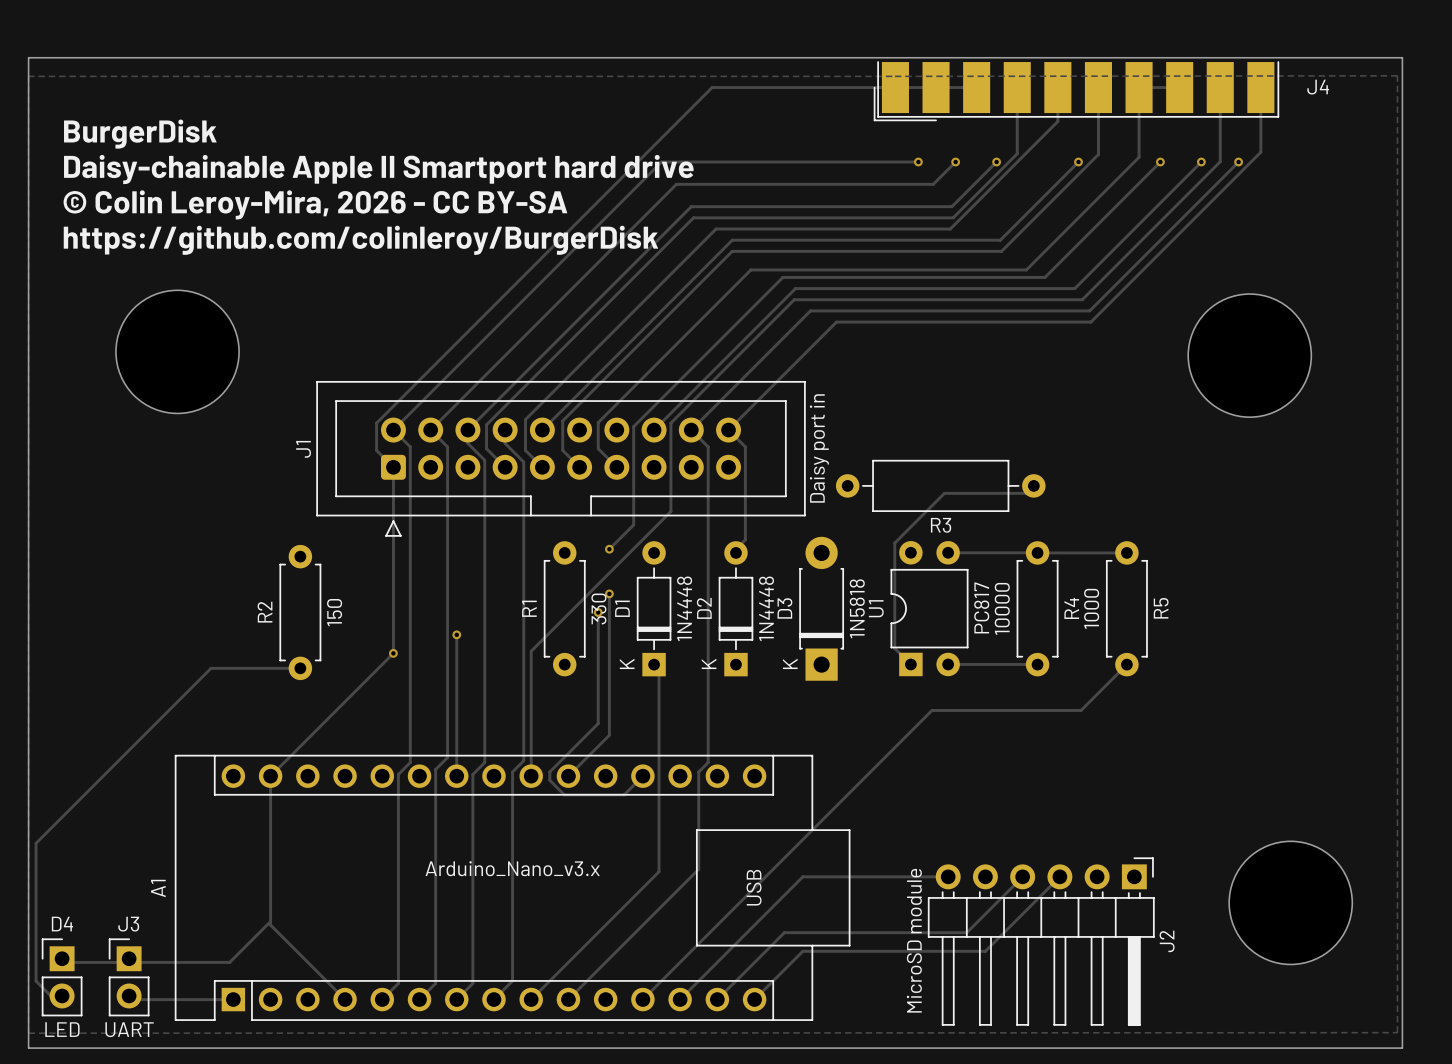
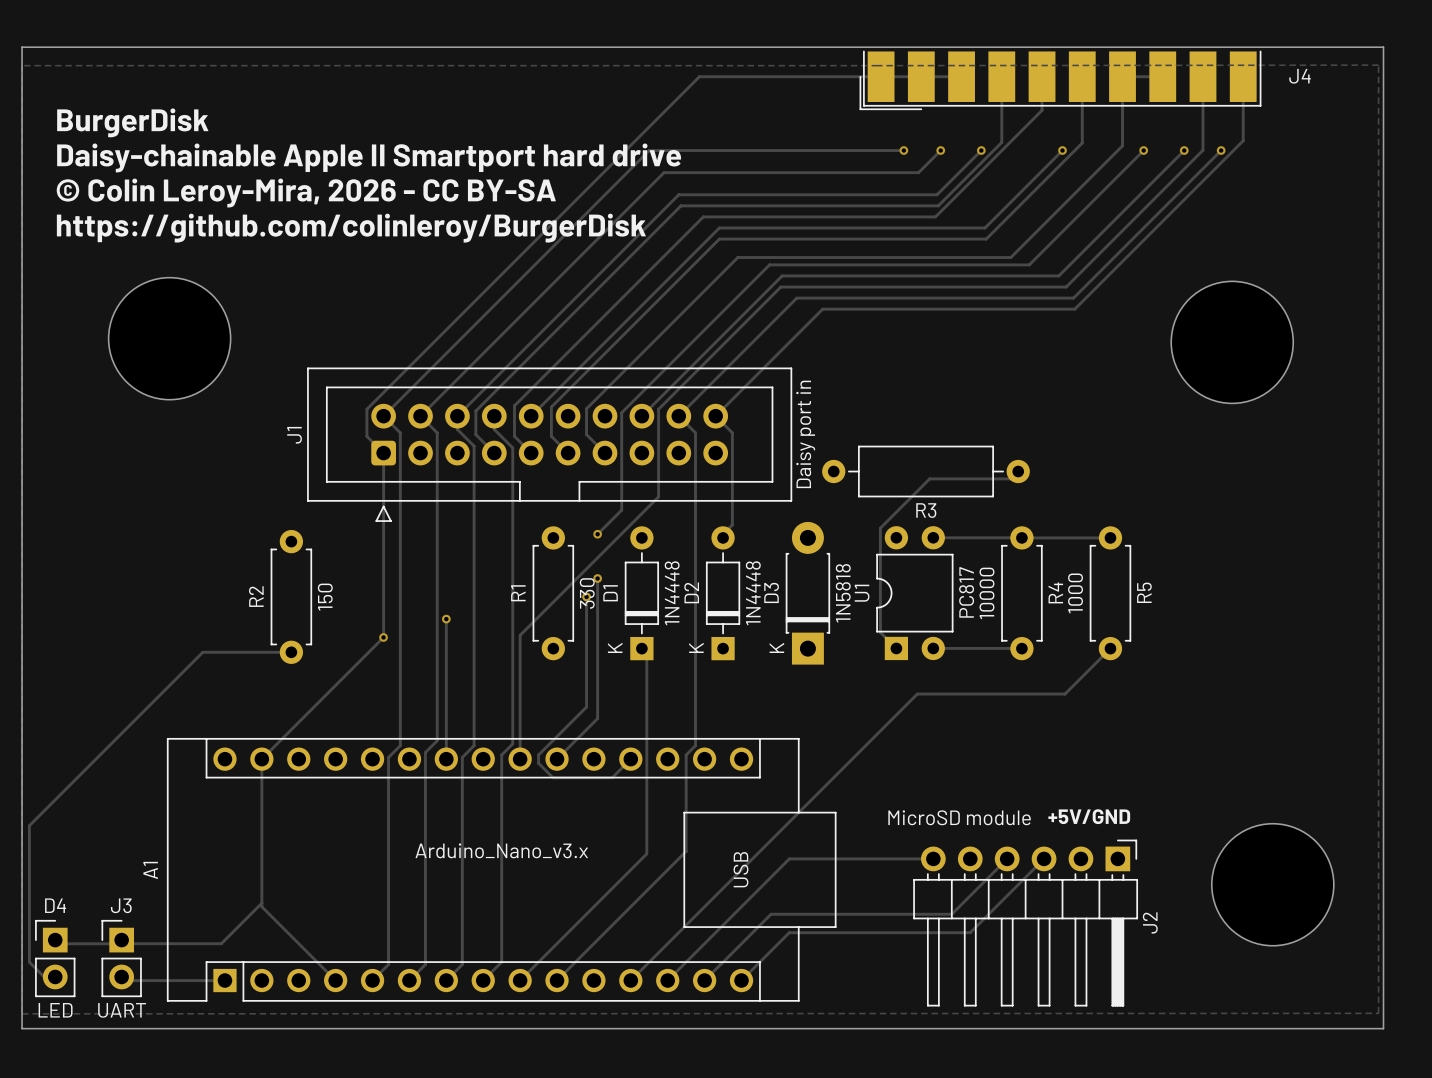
text: none -> +5V/GND (1089, 816)
J2 value rotation: 0° (914, 940) -> 90° clockwise (959, 817)

